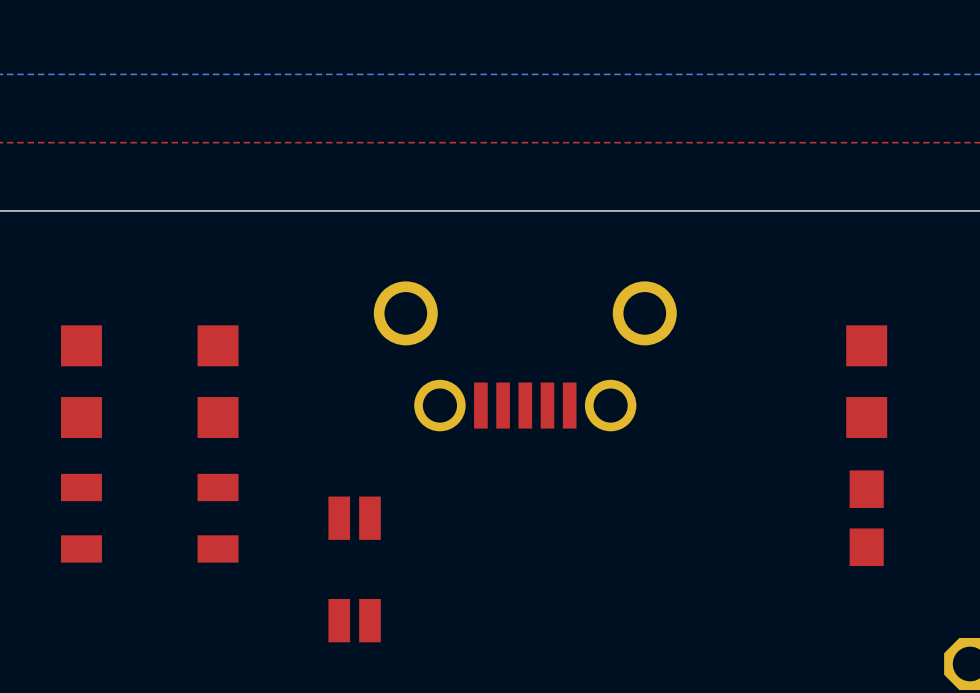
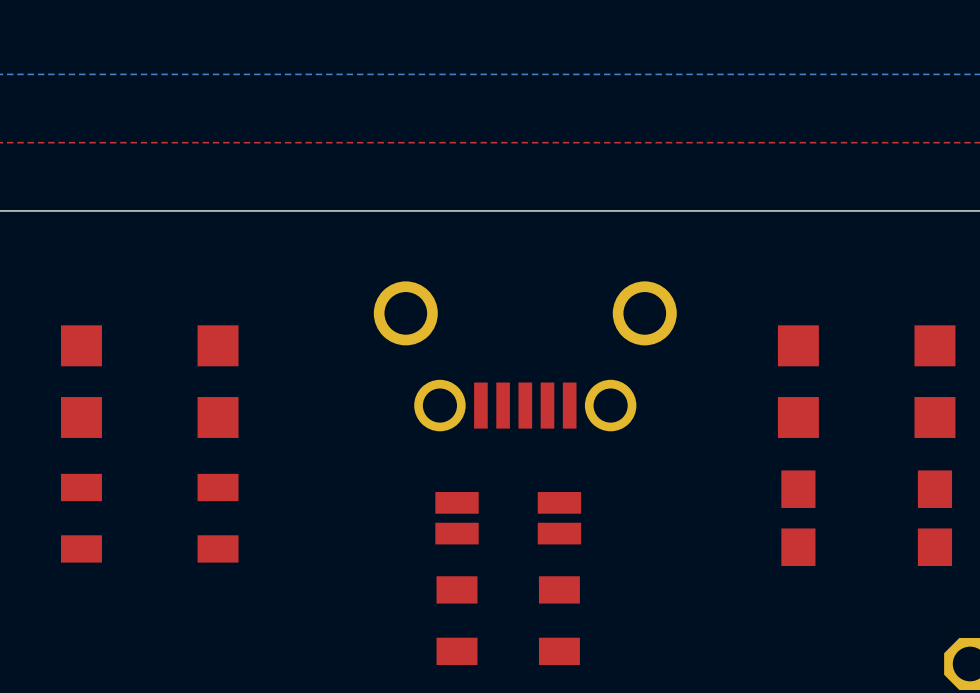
part: none -> (798, 381)
part: (866, 381) -> none
part: none -> (934, 381)
part: (354, 518) -> none
part: none -> (457, 518)
part: none -> (559, 518)
part: none -> (798, 518)
part: (866, 518) -> none
part: none -> (934, 518)
part: (354, 620) -> none
part: none -> (457, 620)
part: none -> (559, 620)

